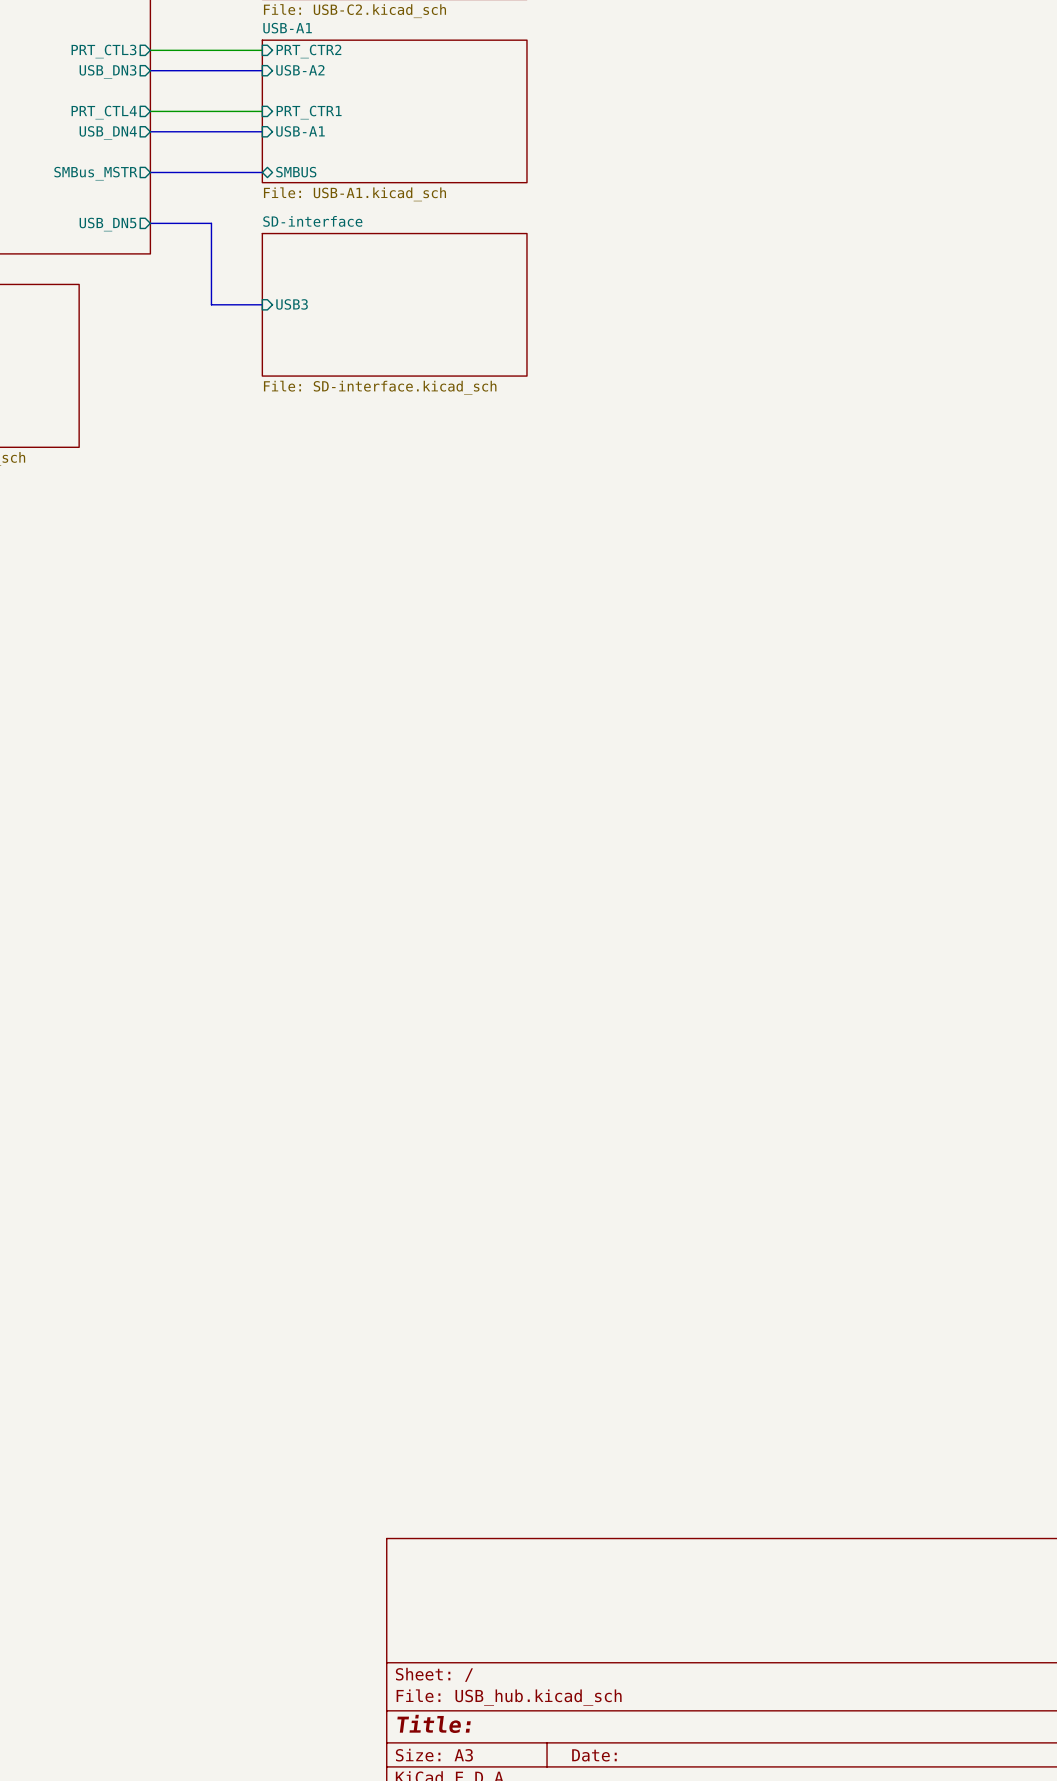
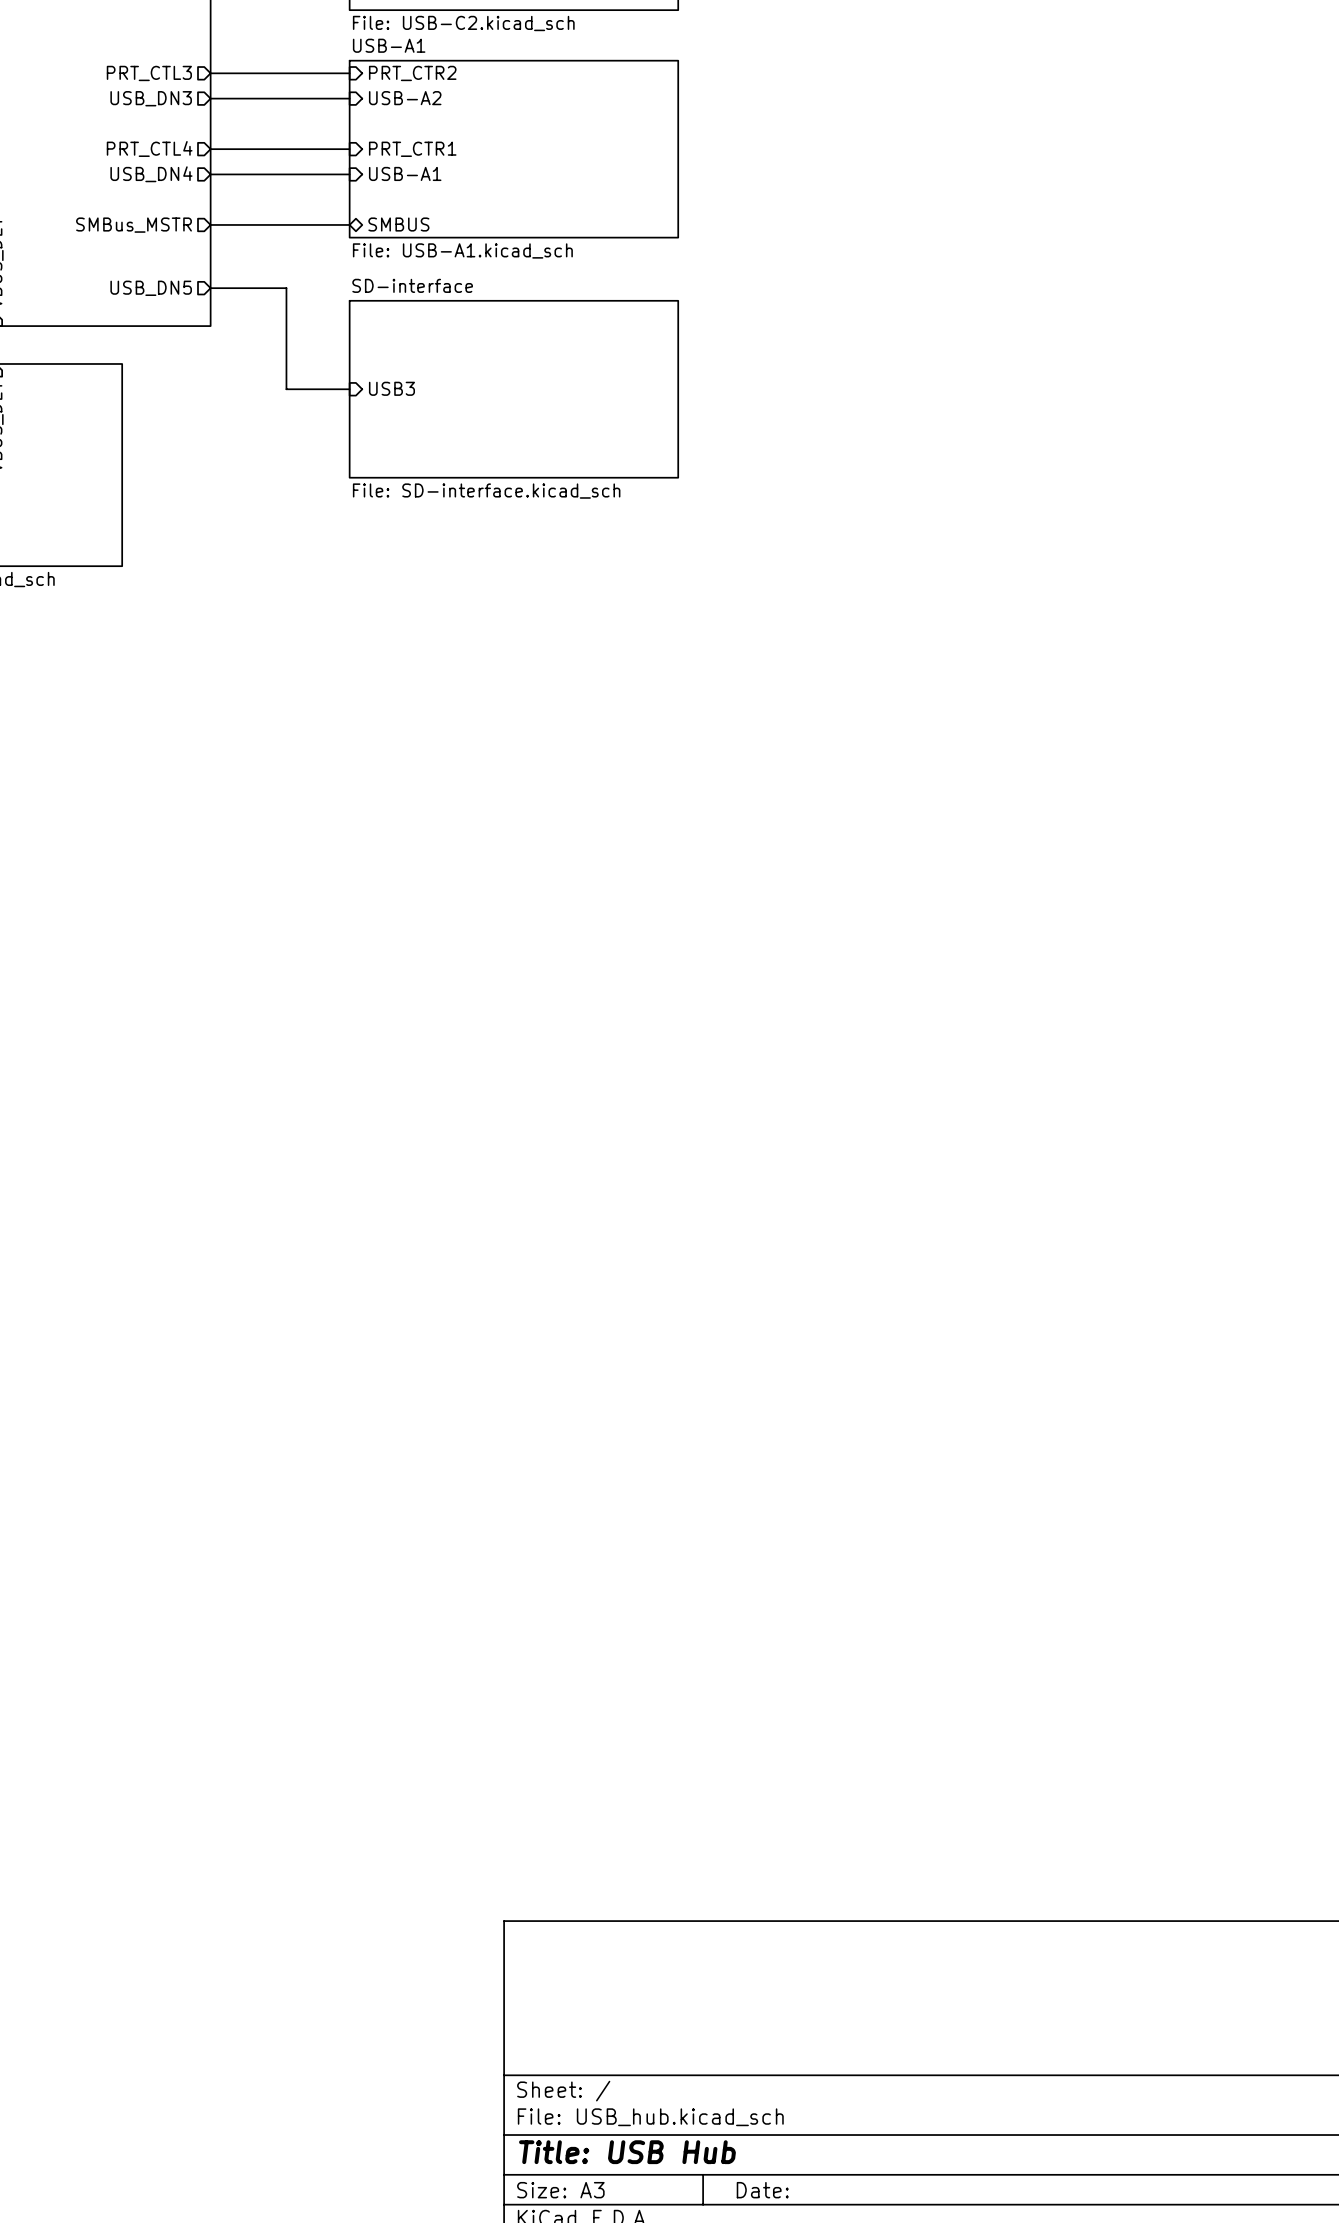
title block: Title: (434, 1723) -> Title: USB Hub (627, 2152)

